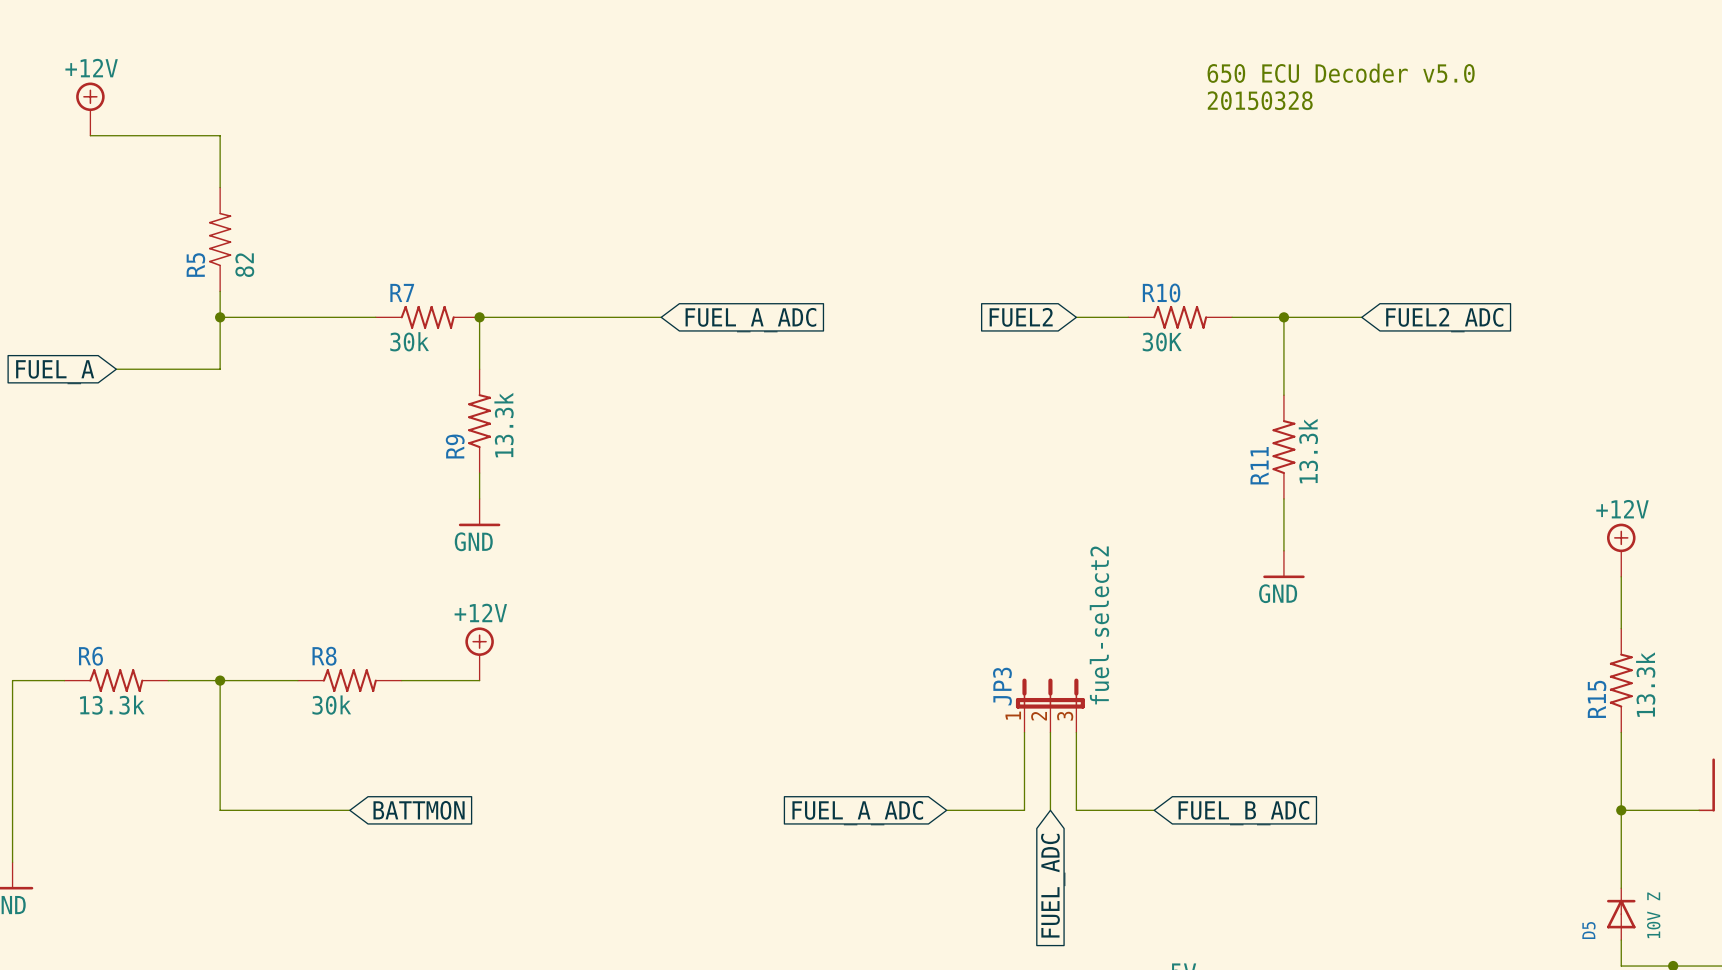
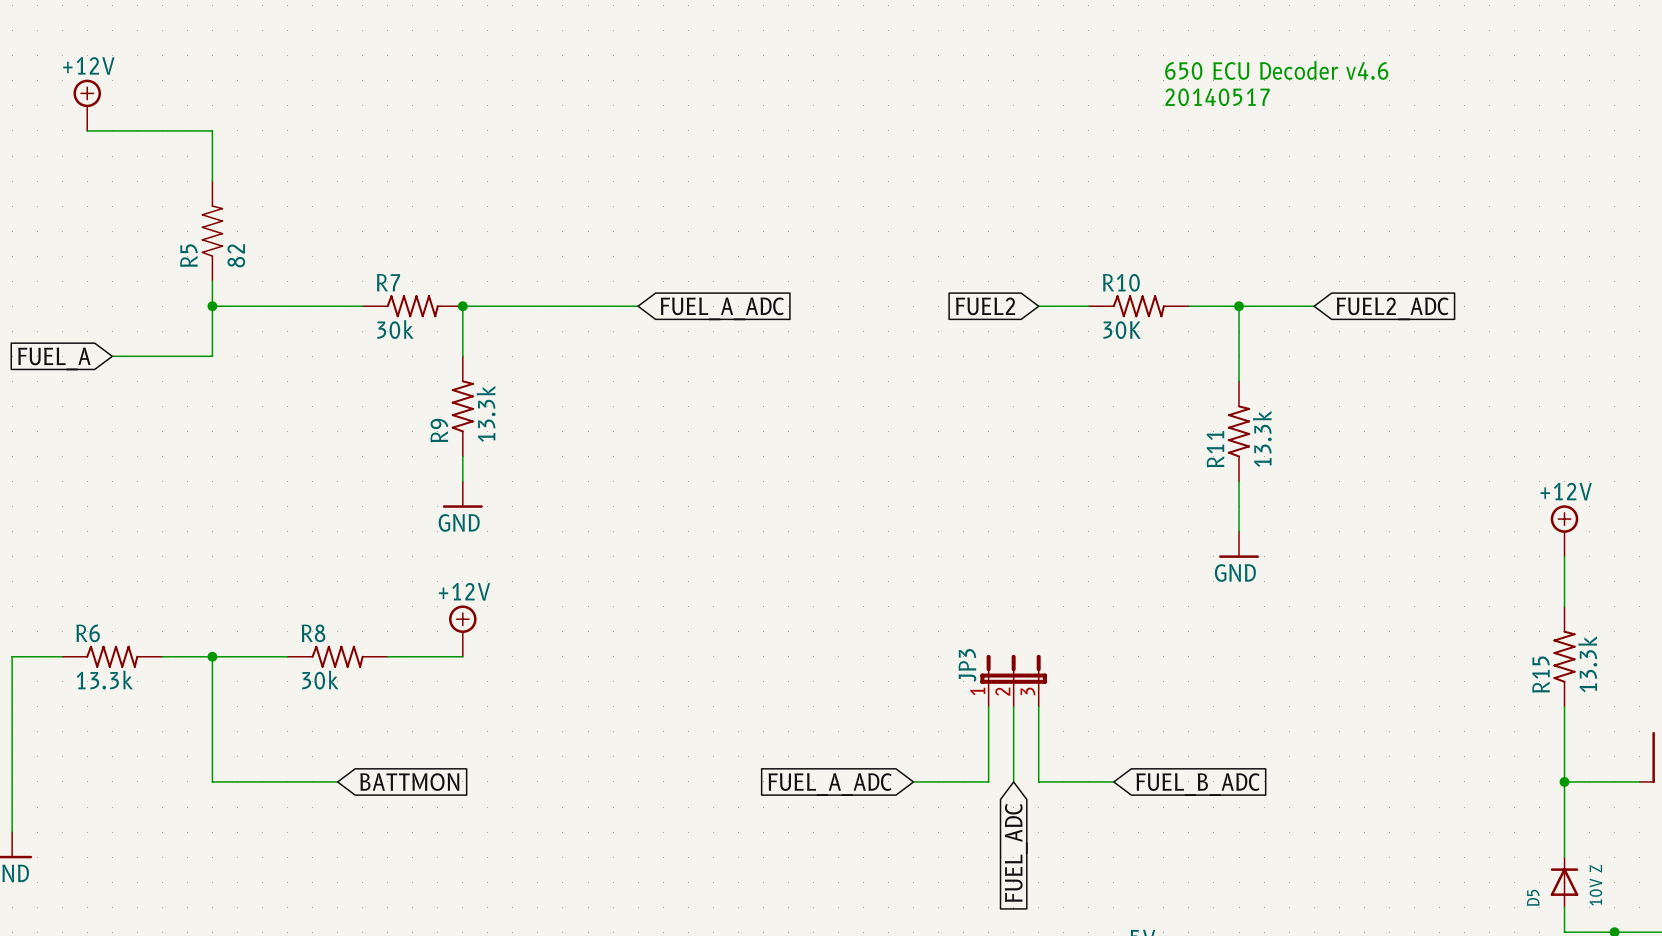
text: 650 ECU Decoder v5.0 (1341, 73) -> 650 ECU Decoder v4.6 (1276, 70)
text: 20150328 (1260, 100) -> 20140517 (1217, 97)
JP3 value: fuel-select2 (1099, 625) -> none

